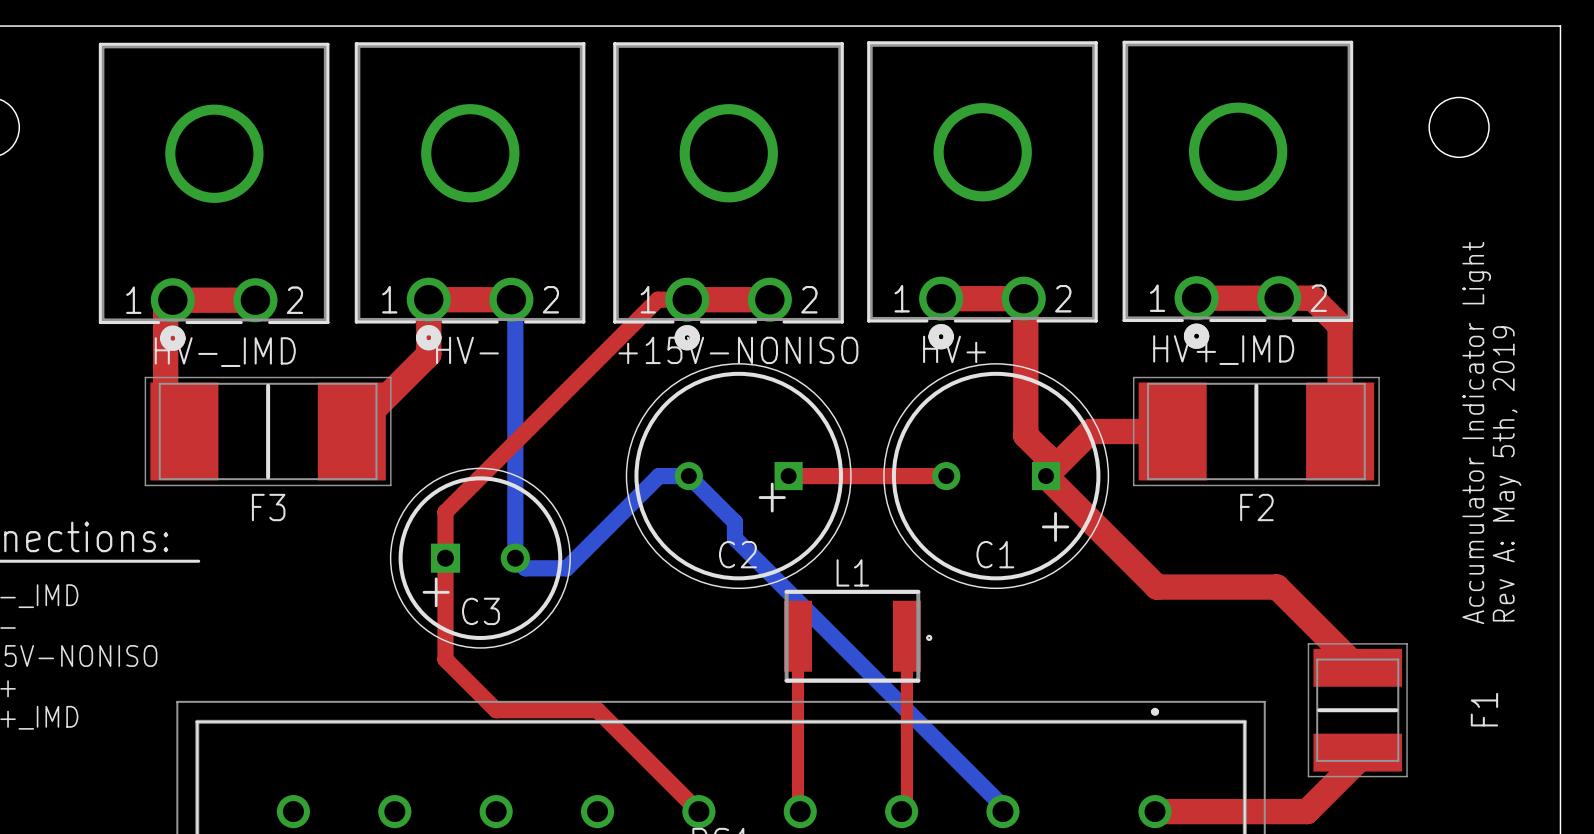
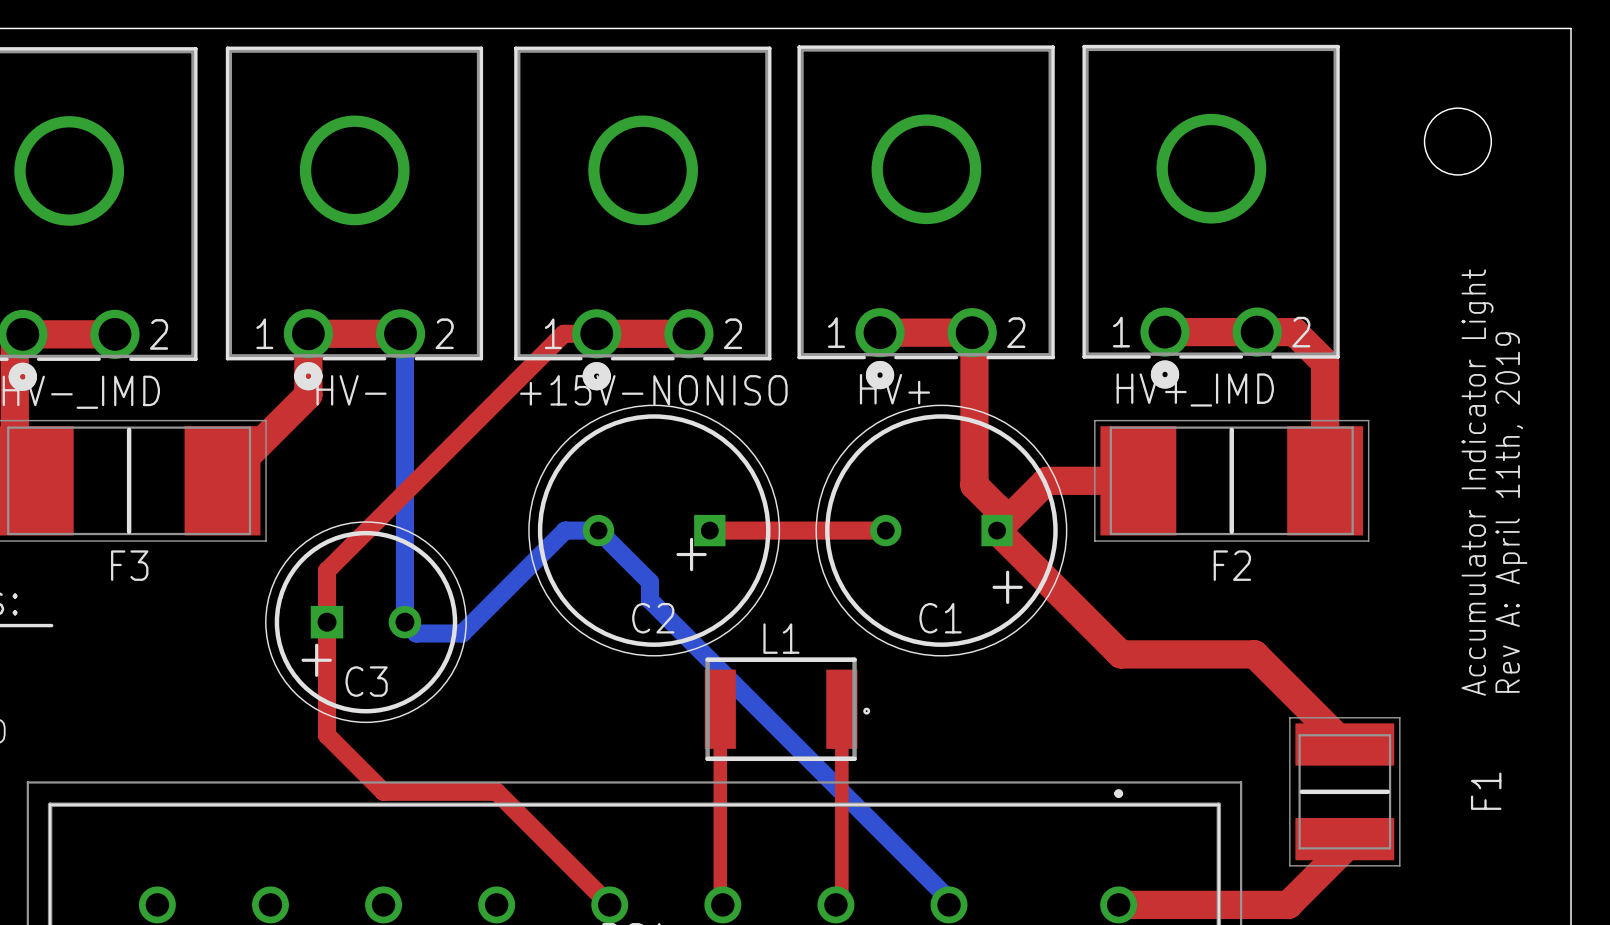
text: Rev A: May 5th, 2019 (1507, 473) -> Rev A: April 11th, 2019 (1511, 512)

